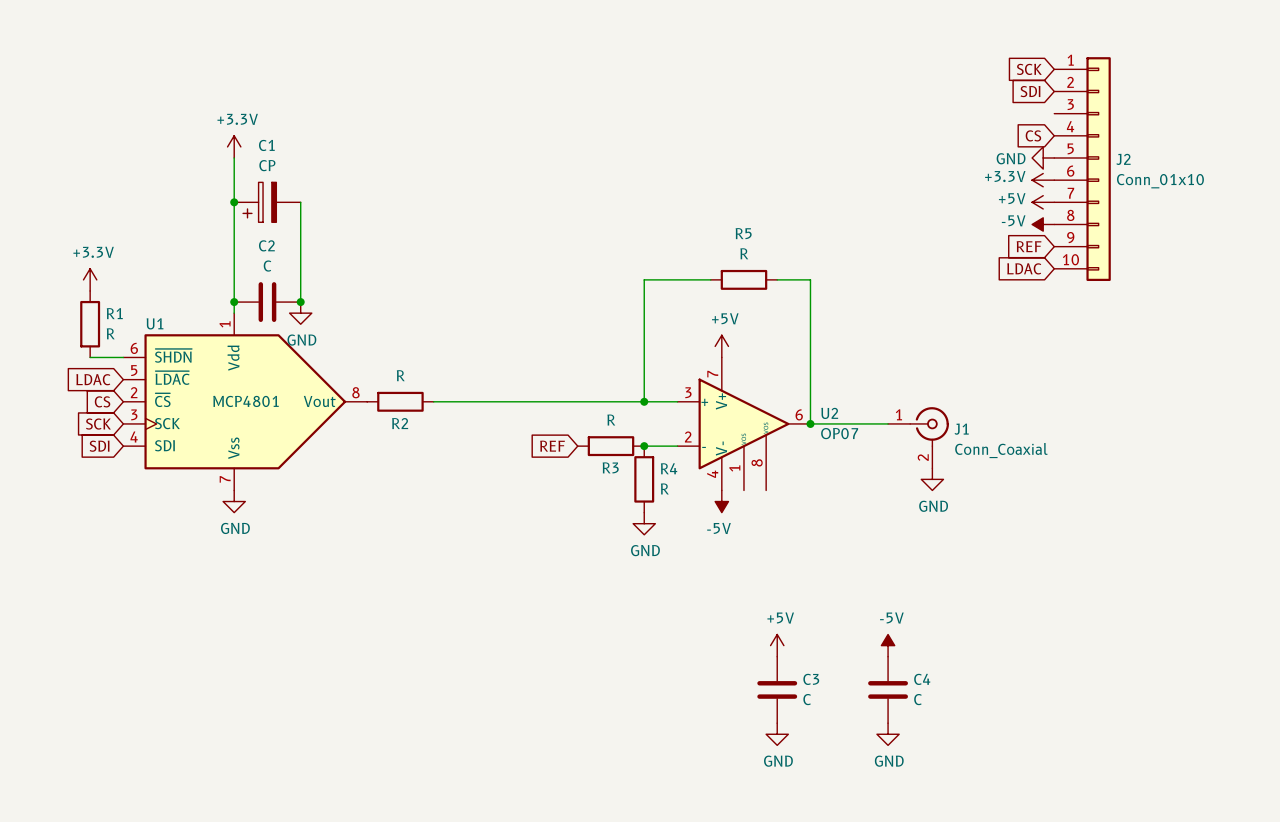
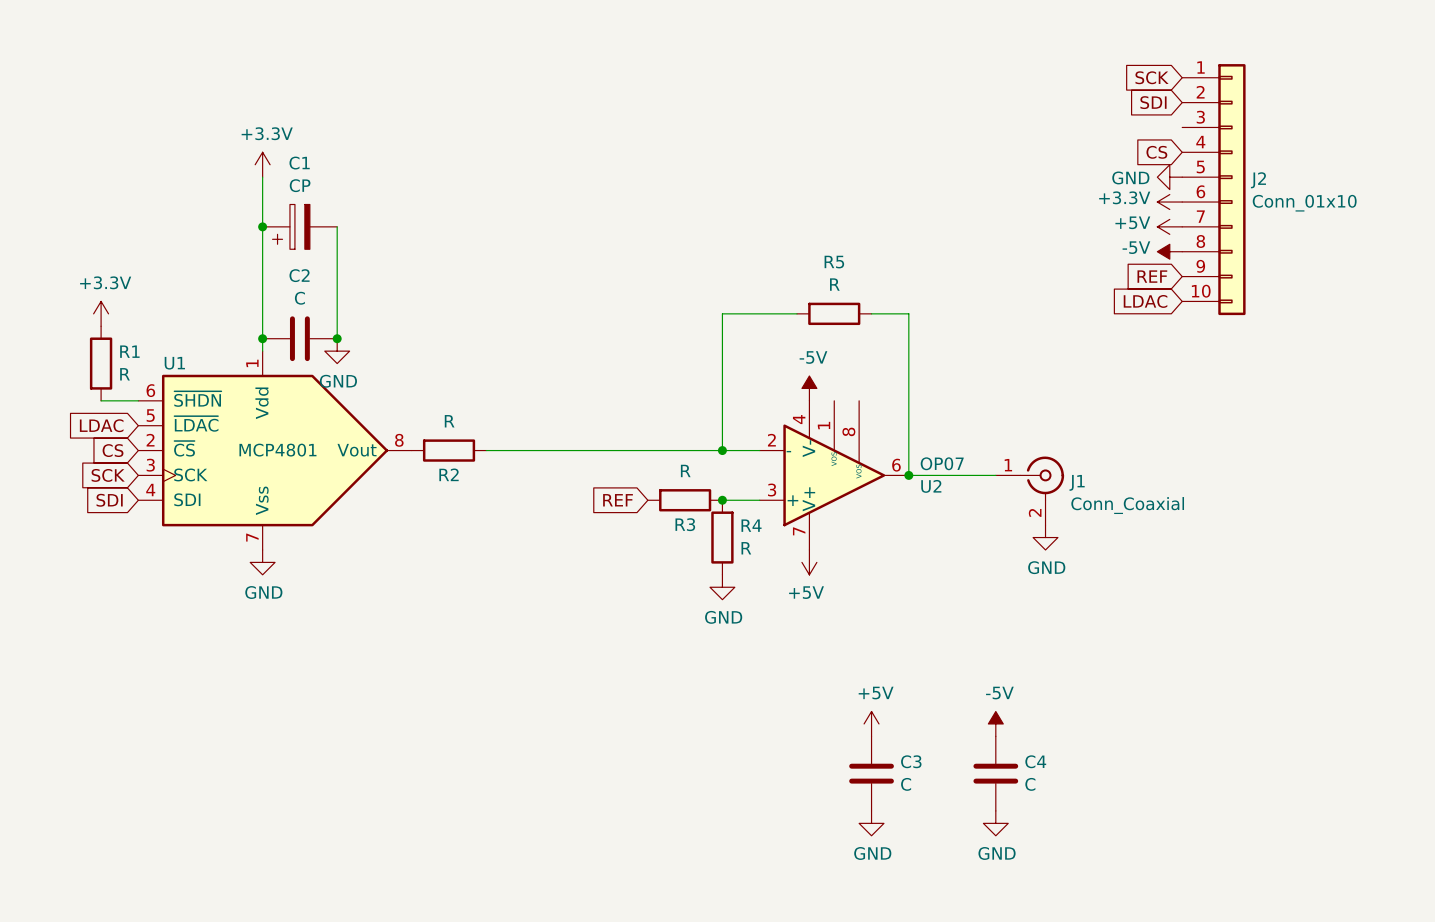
power symbol: +5V (721, 346) -> -5V (809, 388)
U2 flip: as is (743, 423) -> up-down (834, 475)
power symbol: -5V (721, 501) -> +5V (809, 562)

